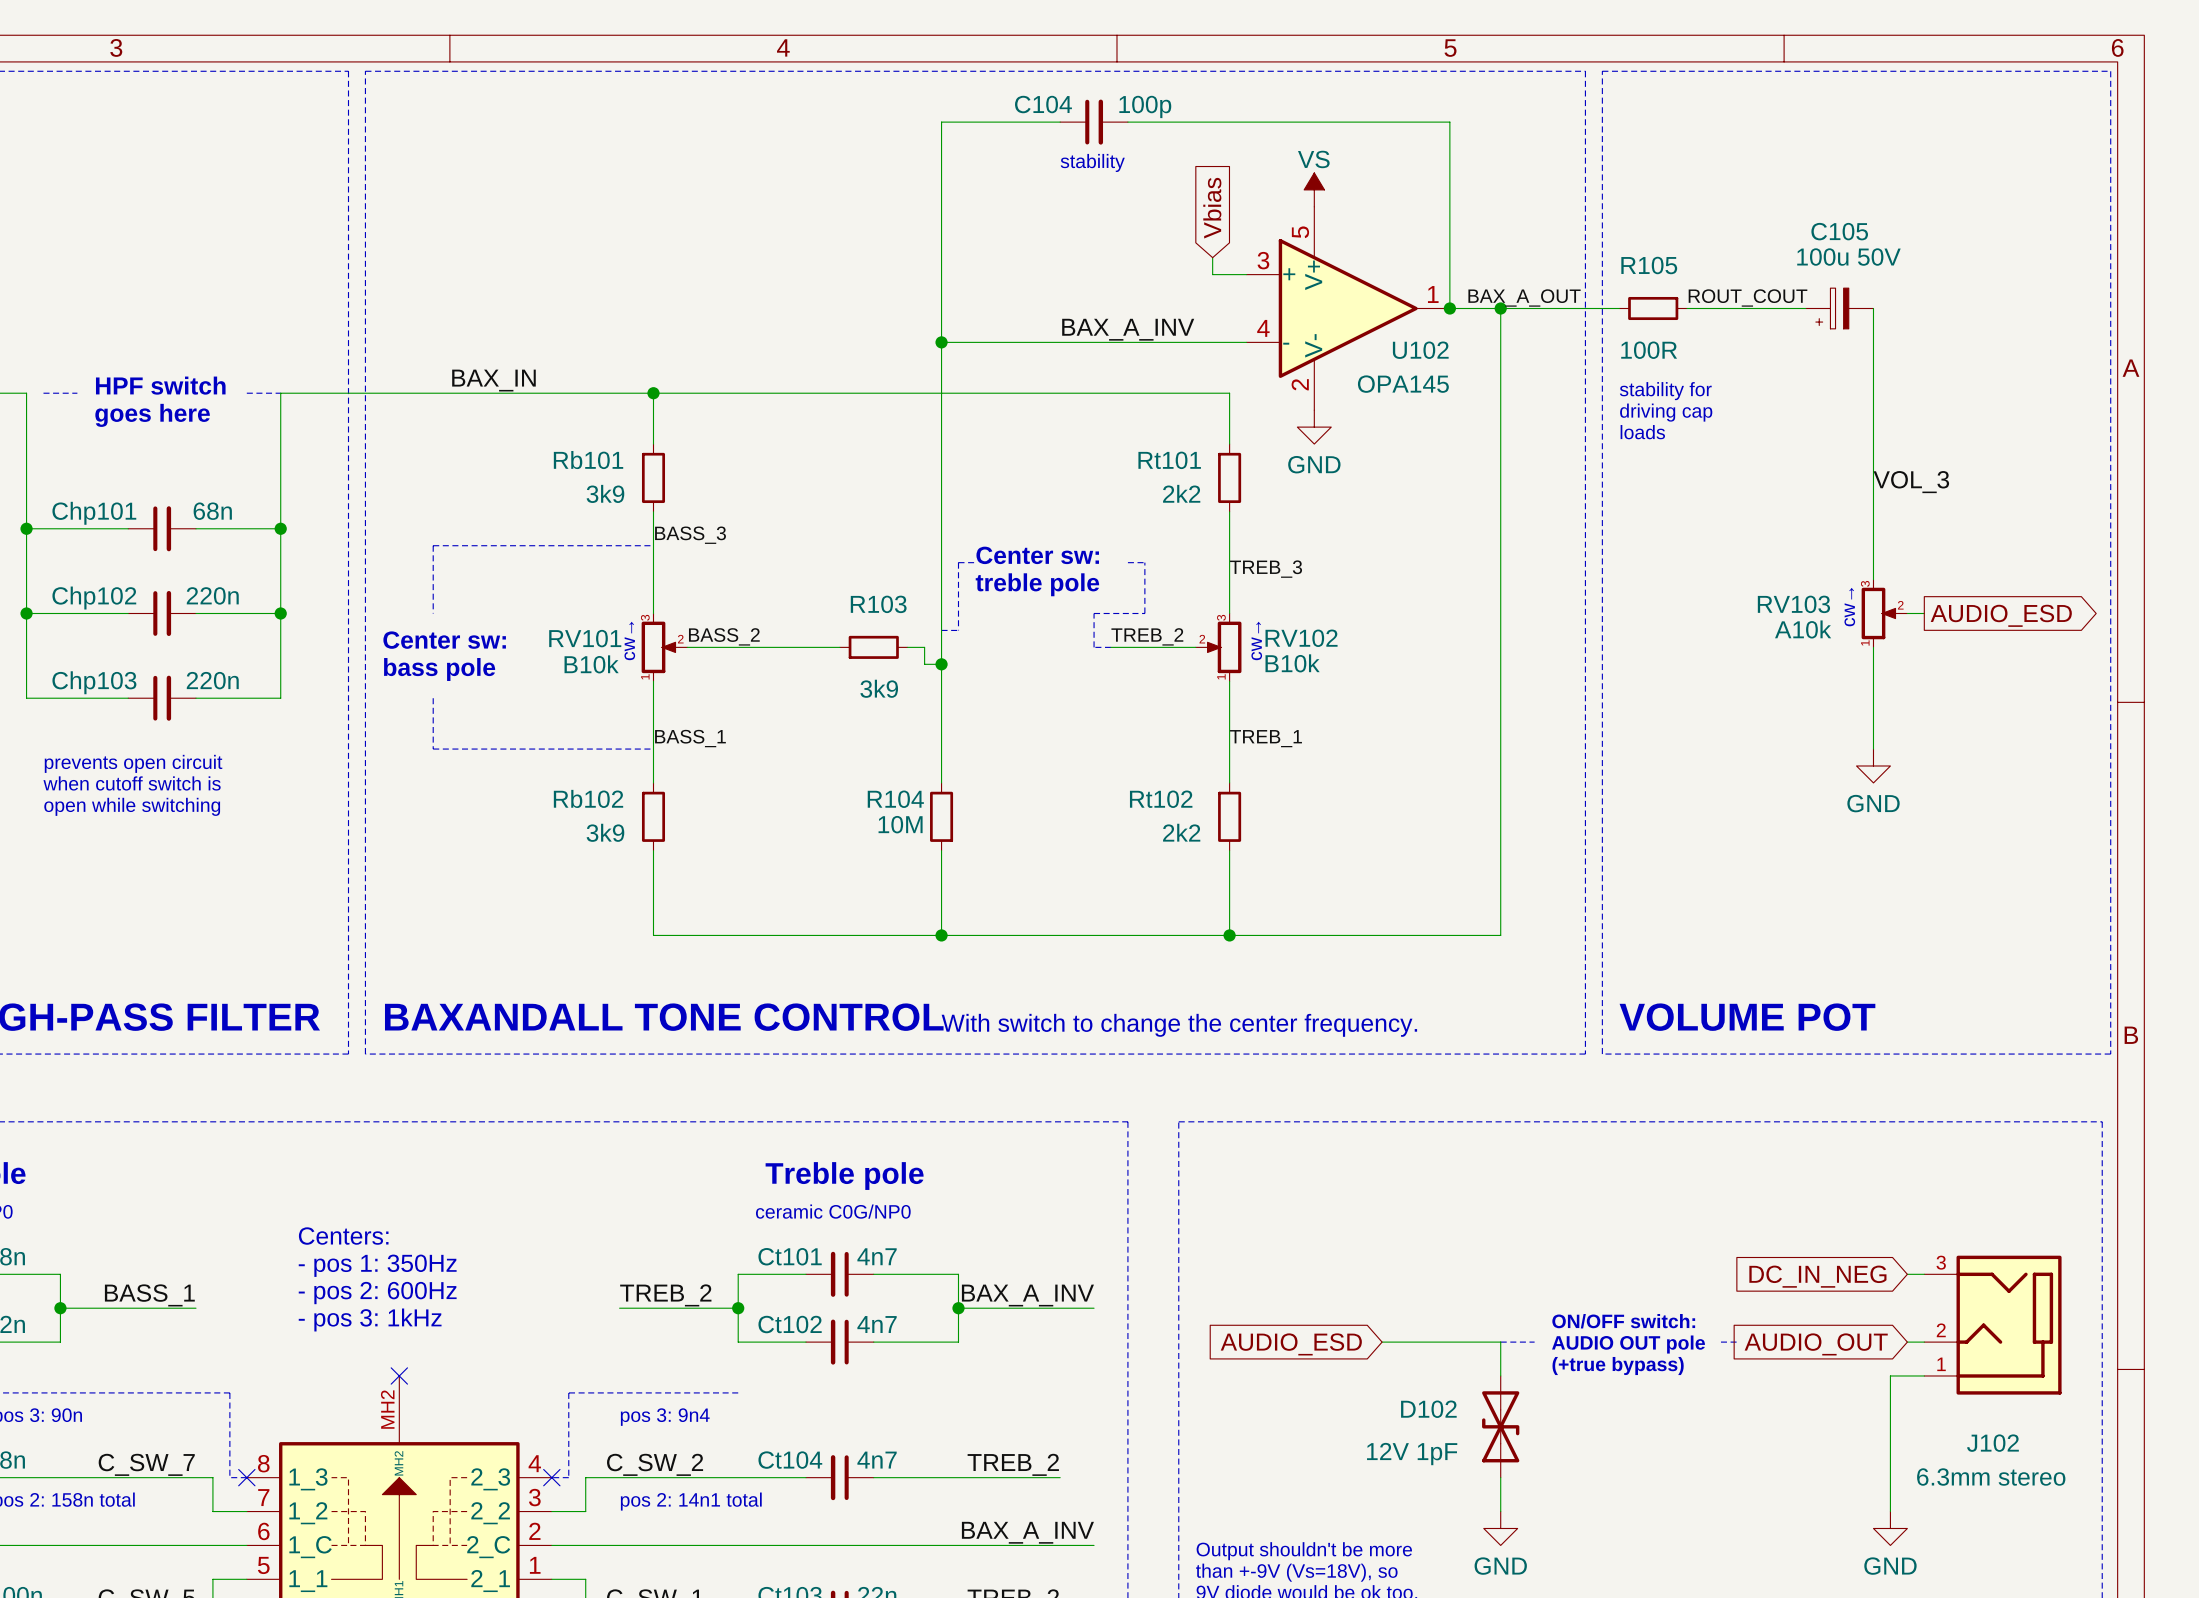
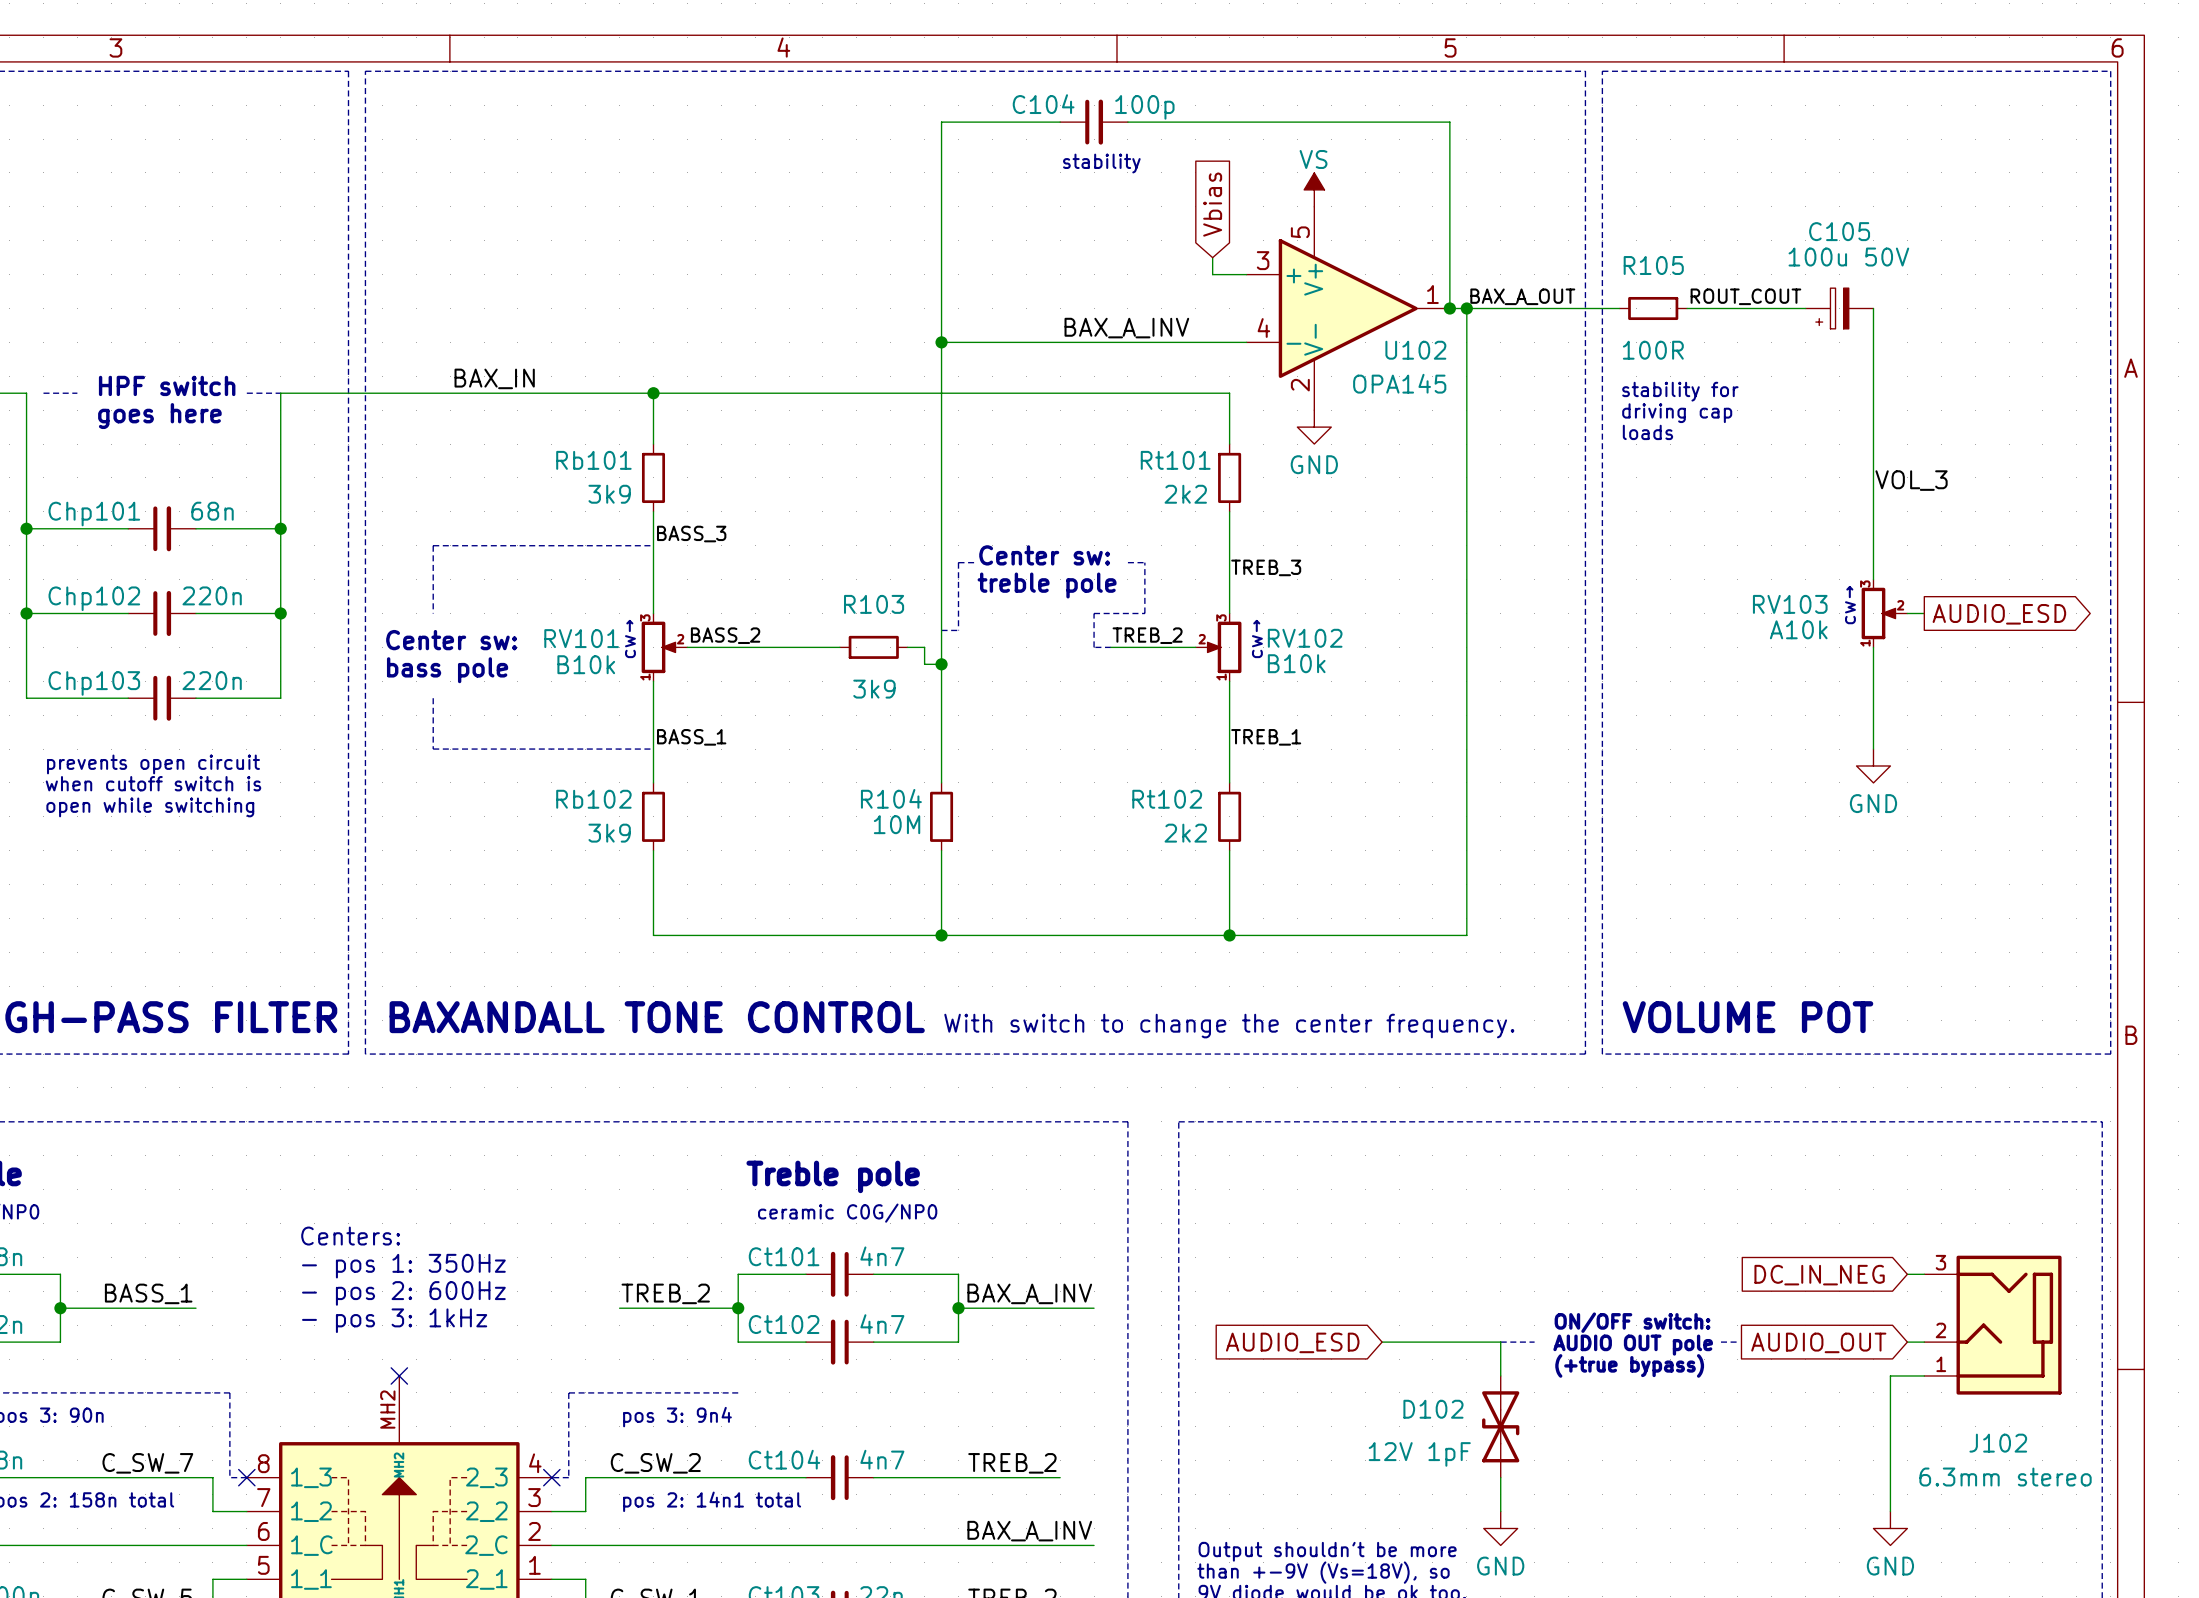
wire: (1500, 308) (1500, 935) (1466, 935) -> (1466, 308) (1466, 935)
junction position: (1500, 308) -> (1466, 308)

